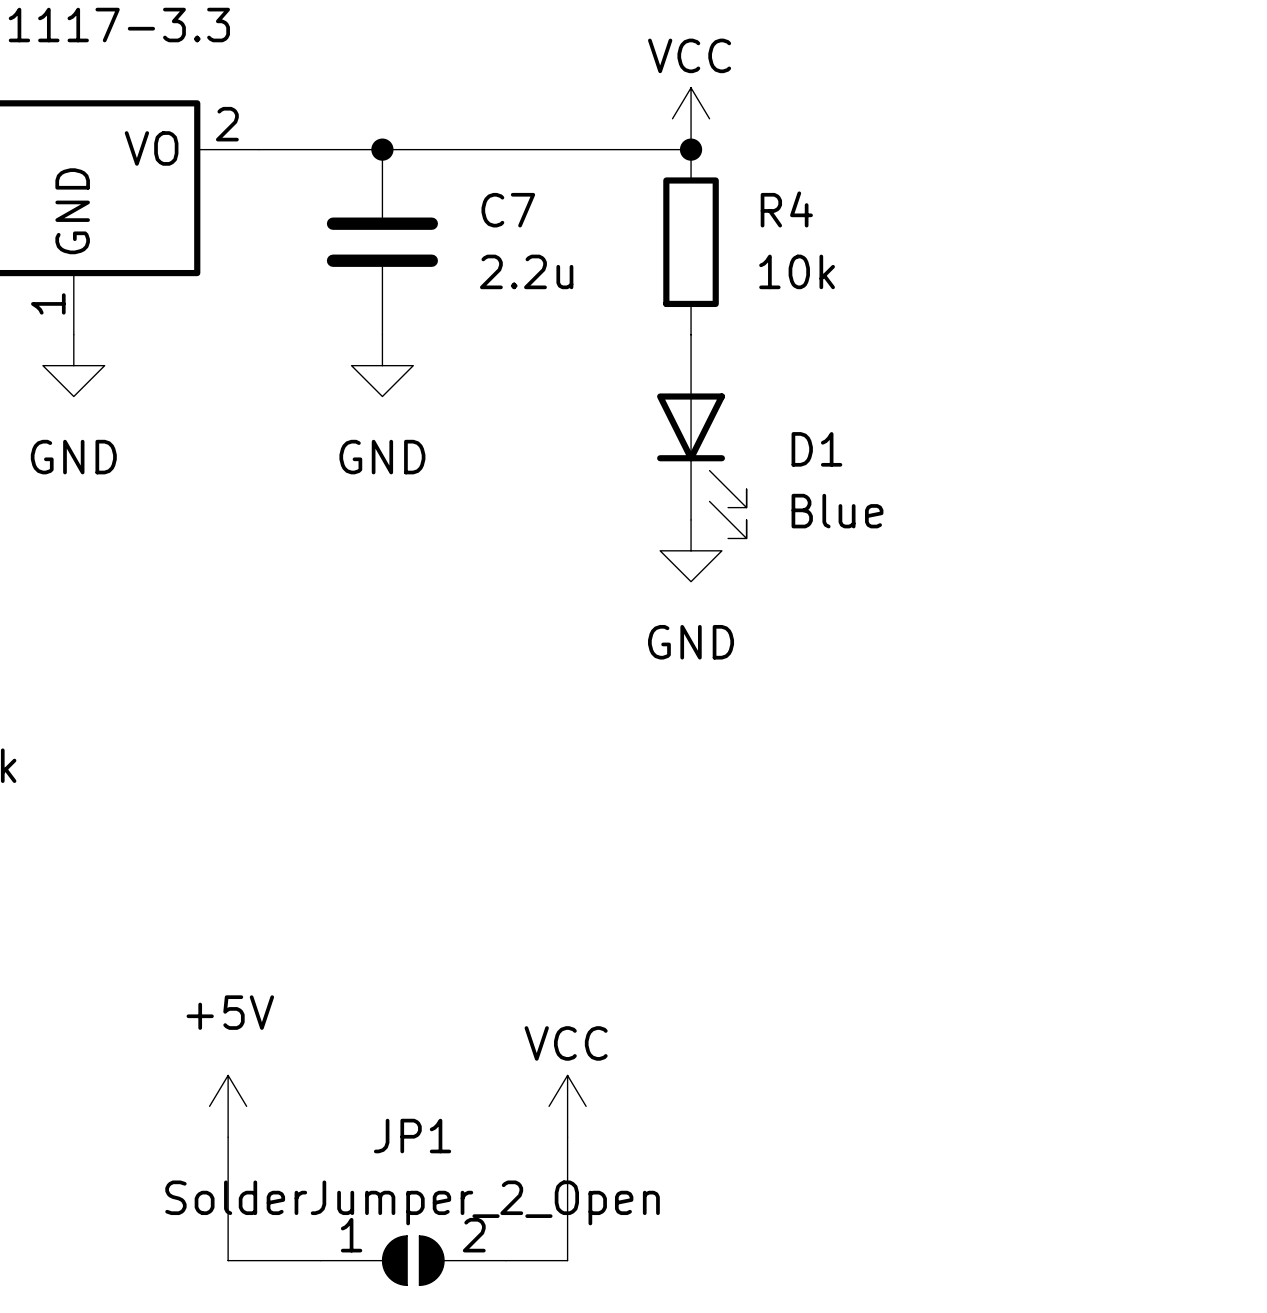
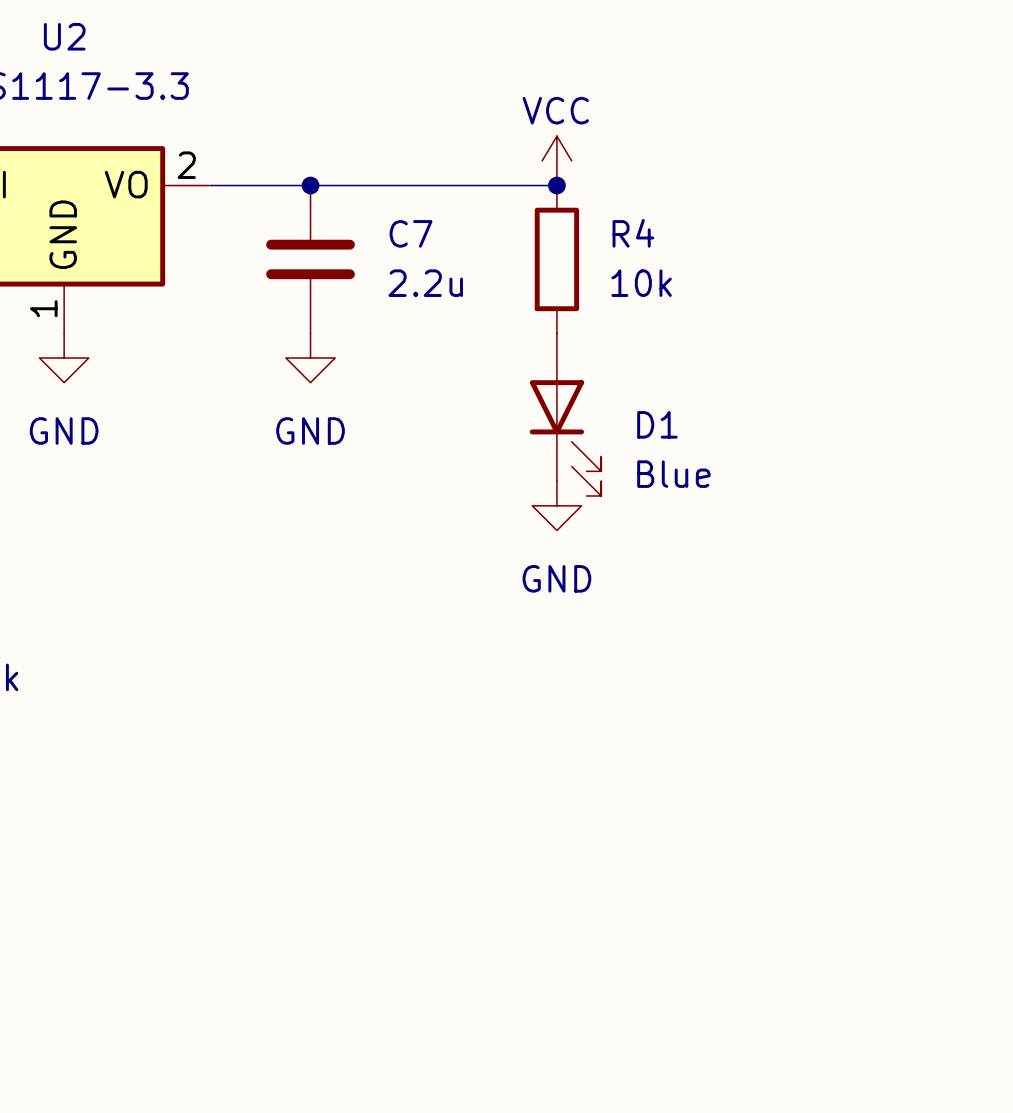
power symbol: +5V (228, 1106) -> none
power symbol: VCC (567, 1106) -> none
wire: (228, 1137) (228, 1260) (320, 1260) -> none
wire: (567, 1137) (567, 1260) (505, 1260) -> none
JP1: SolderJumper_2_Open (413, 1260) -> none

